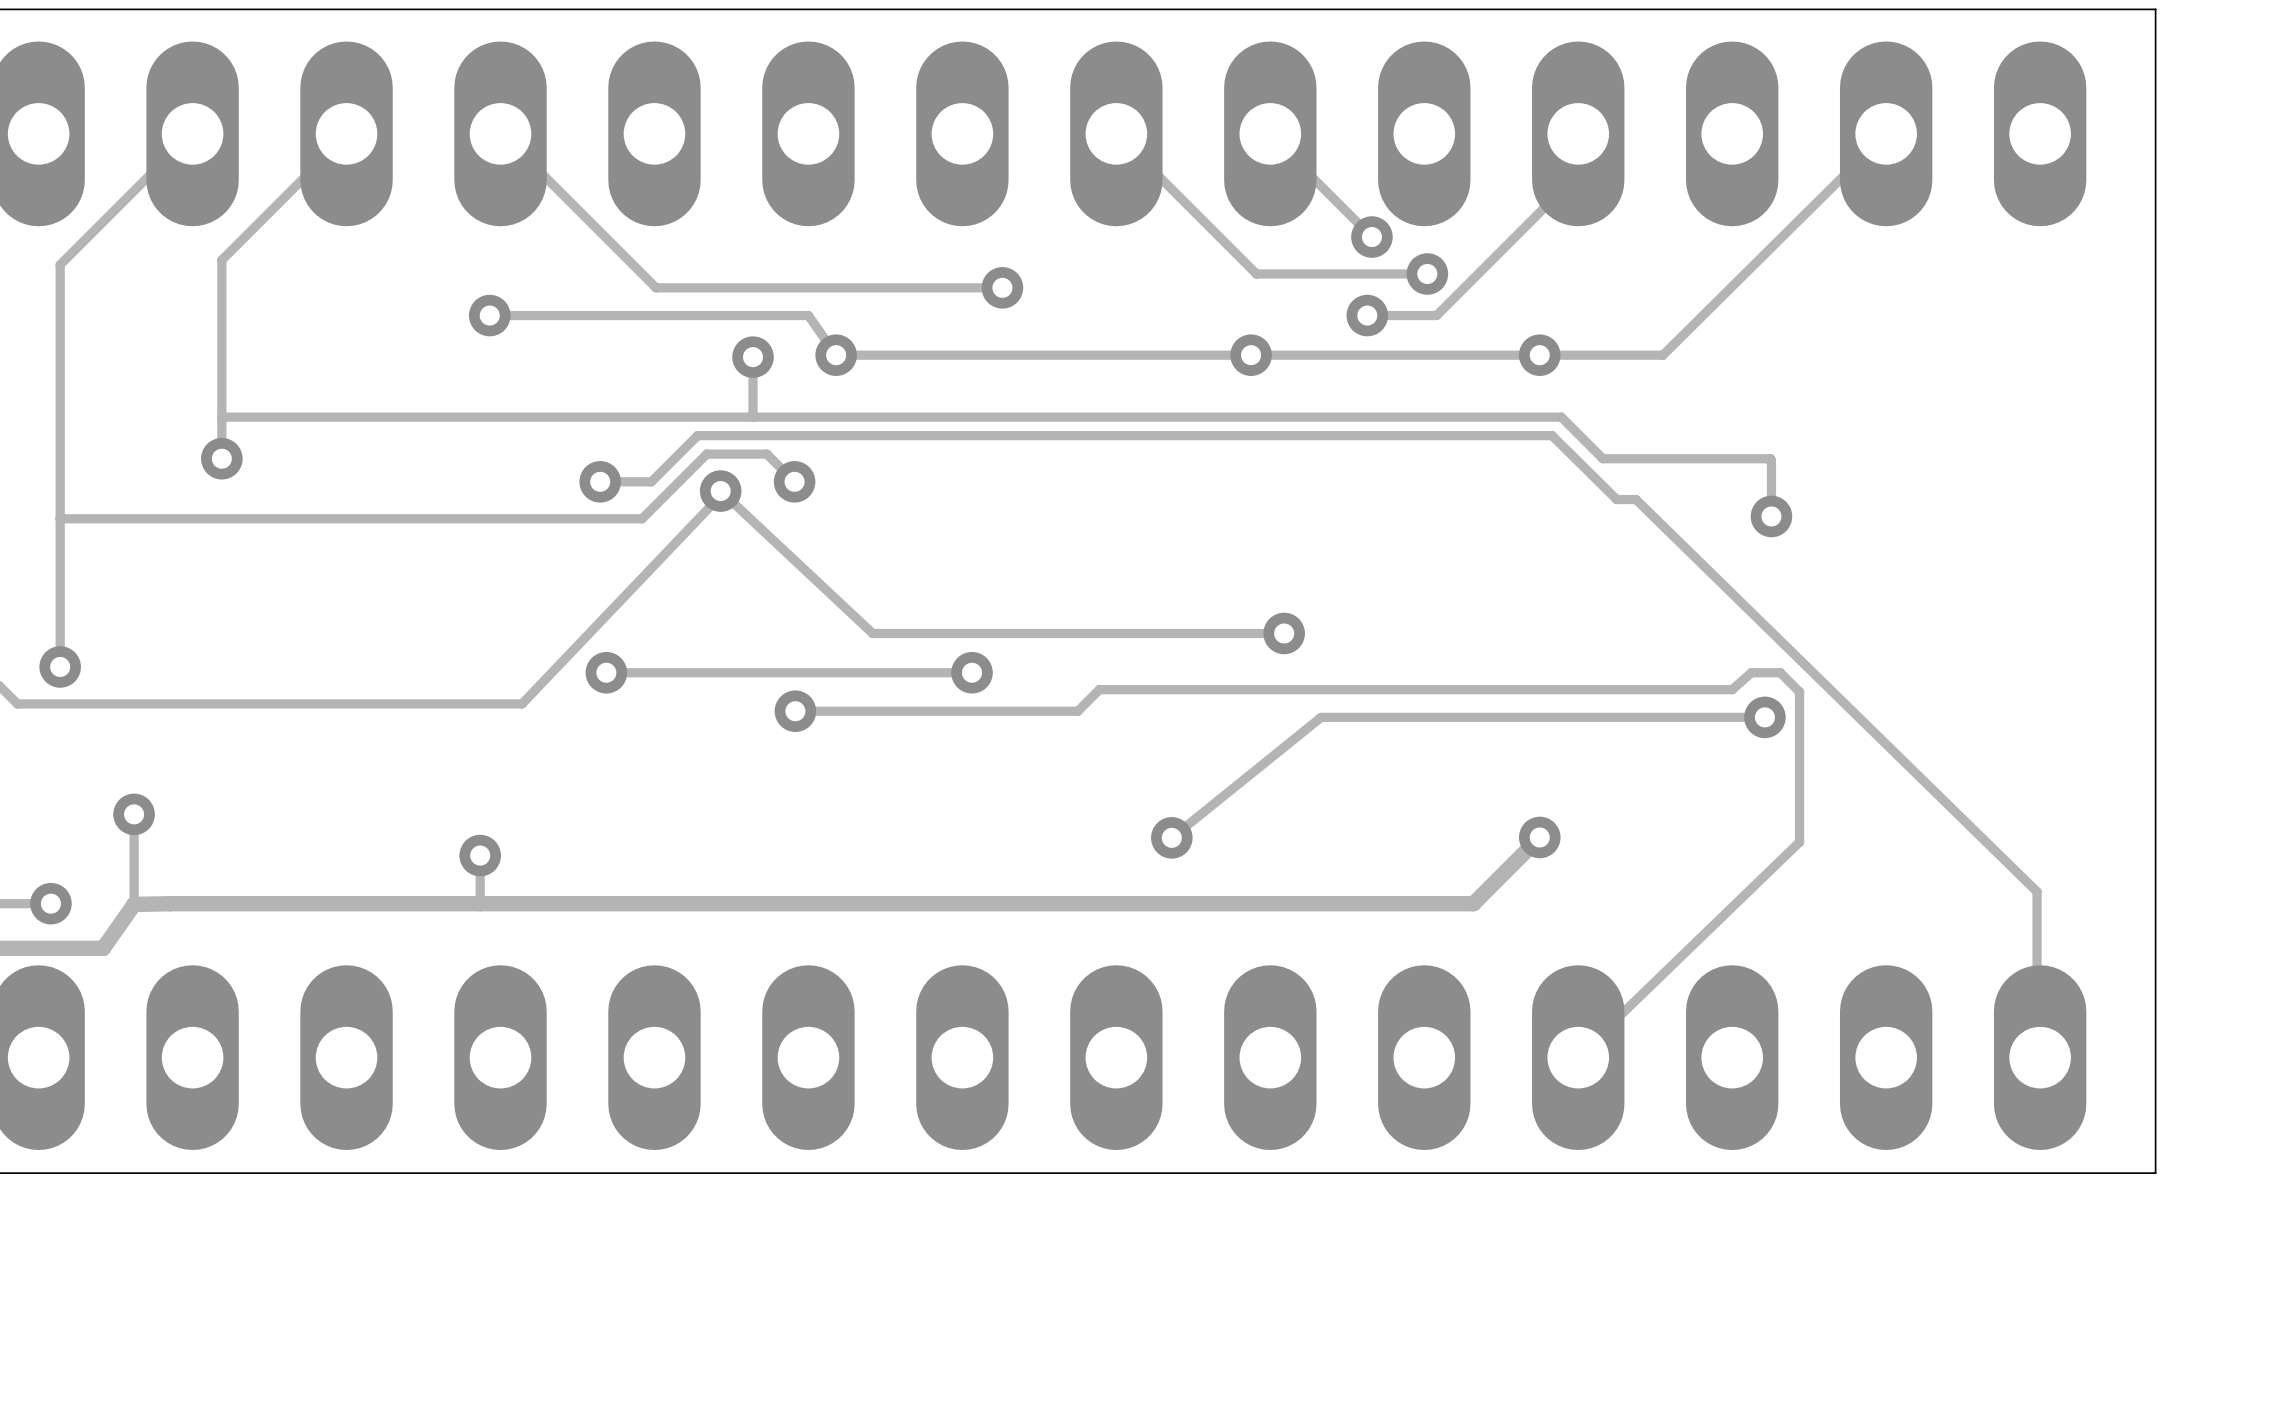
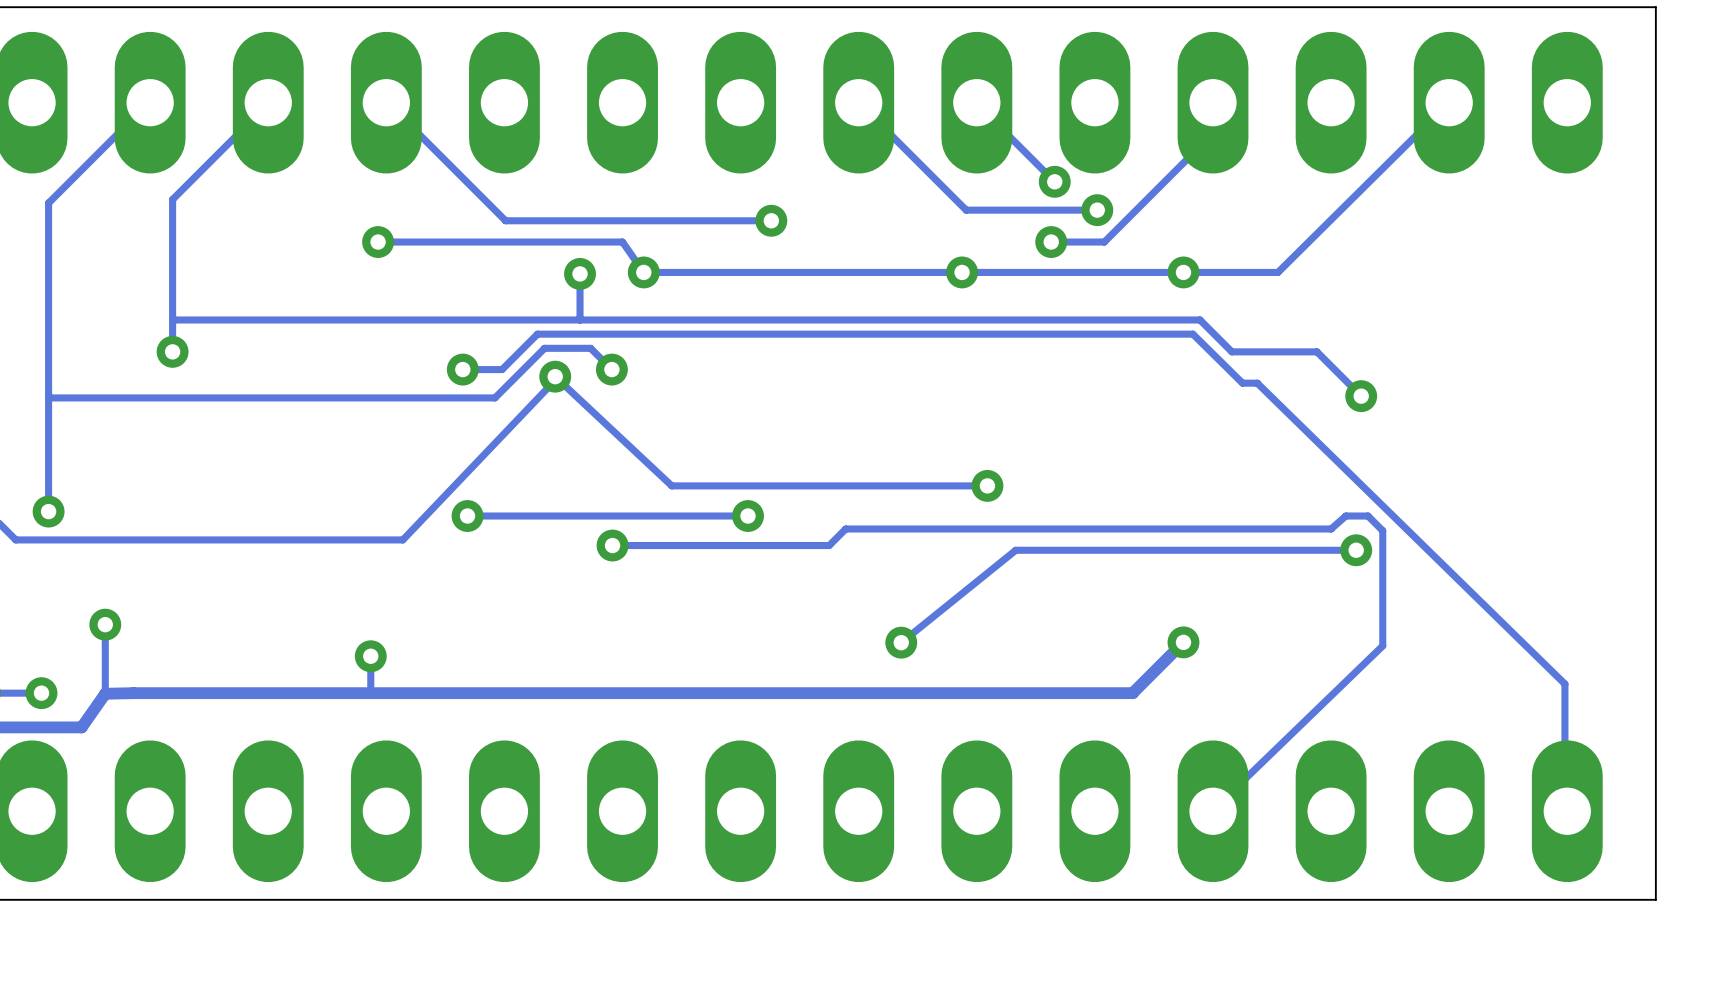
track: (1713, 458) (1770, 458) (1770, 461) -> (1316, 351) (1361, 396)
track: (1771, 461) (1771, 516) -> none

